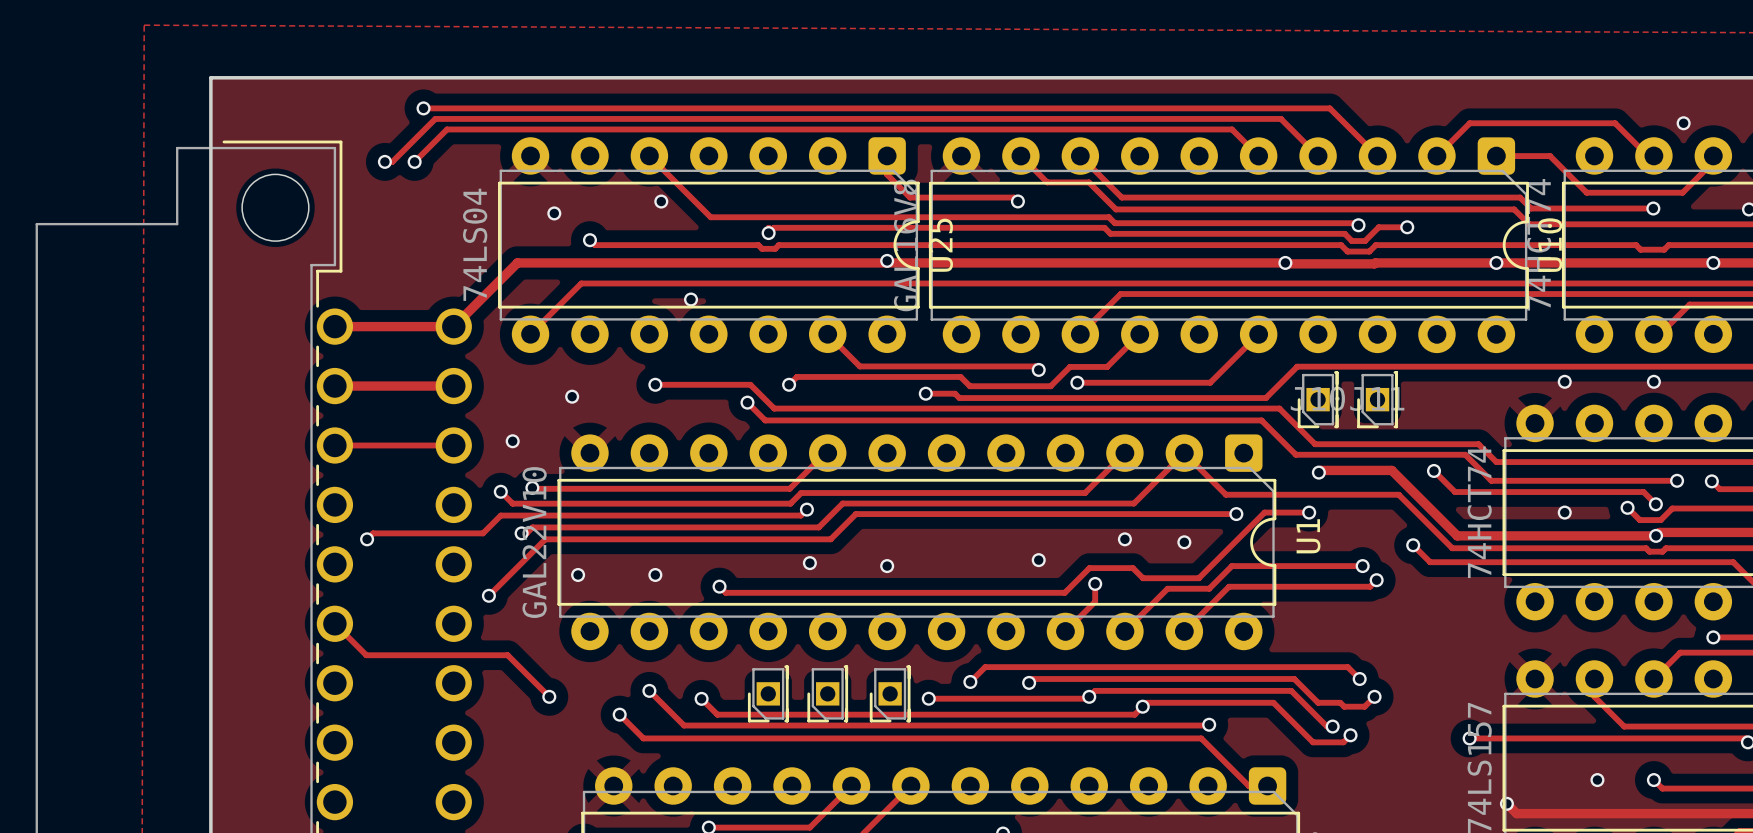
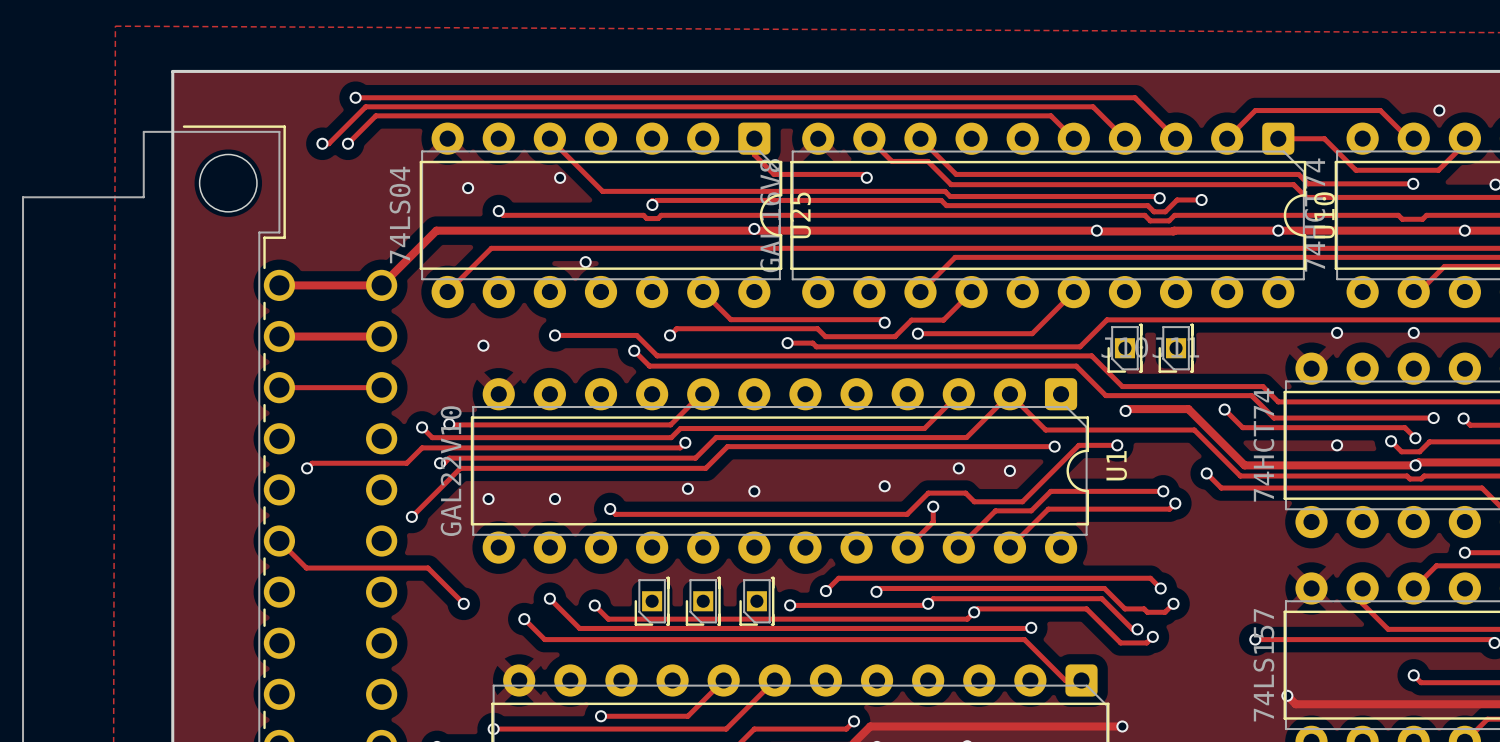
via: (512, 441) -> none
via: (1597, 780) -> none

